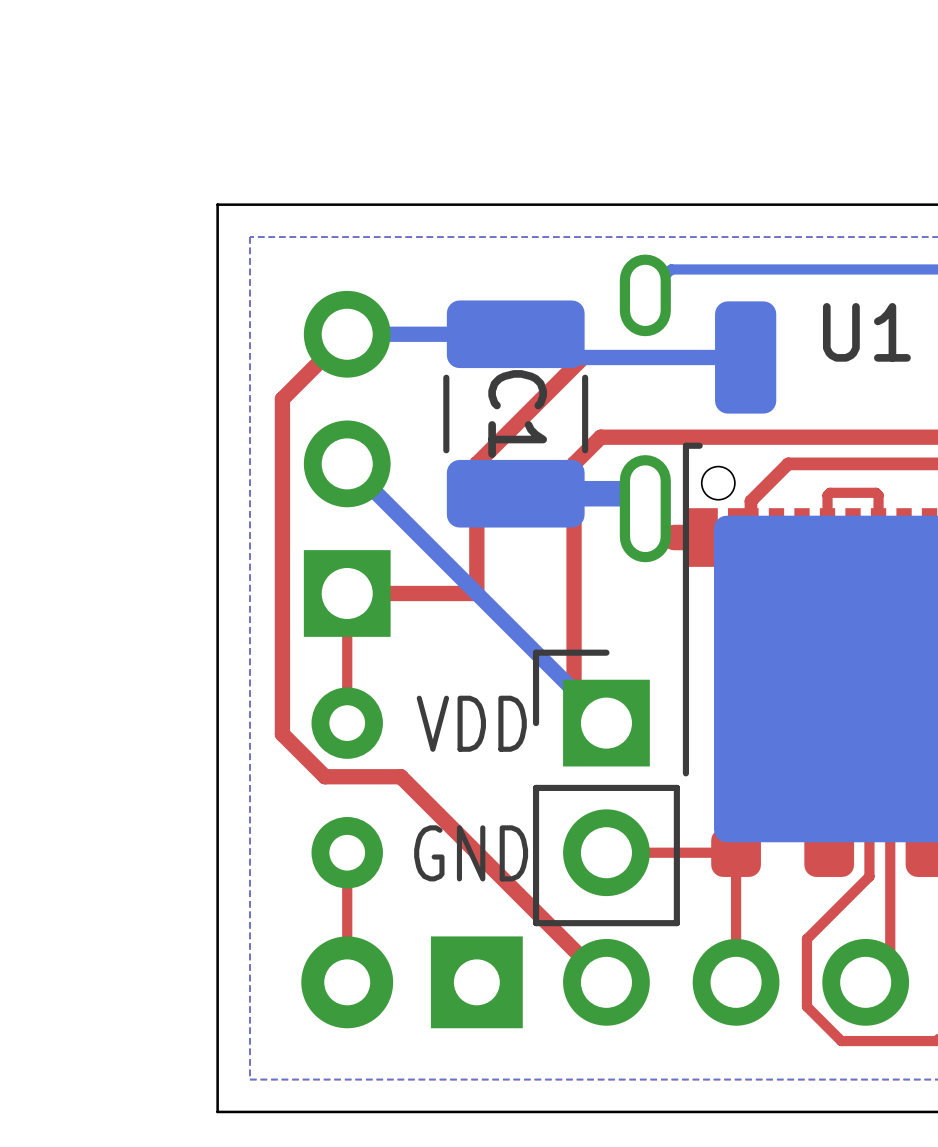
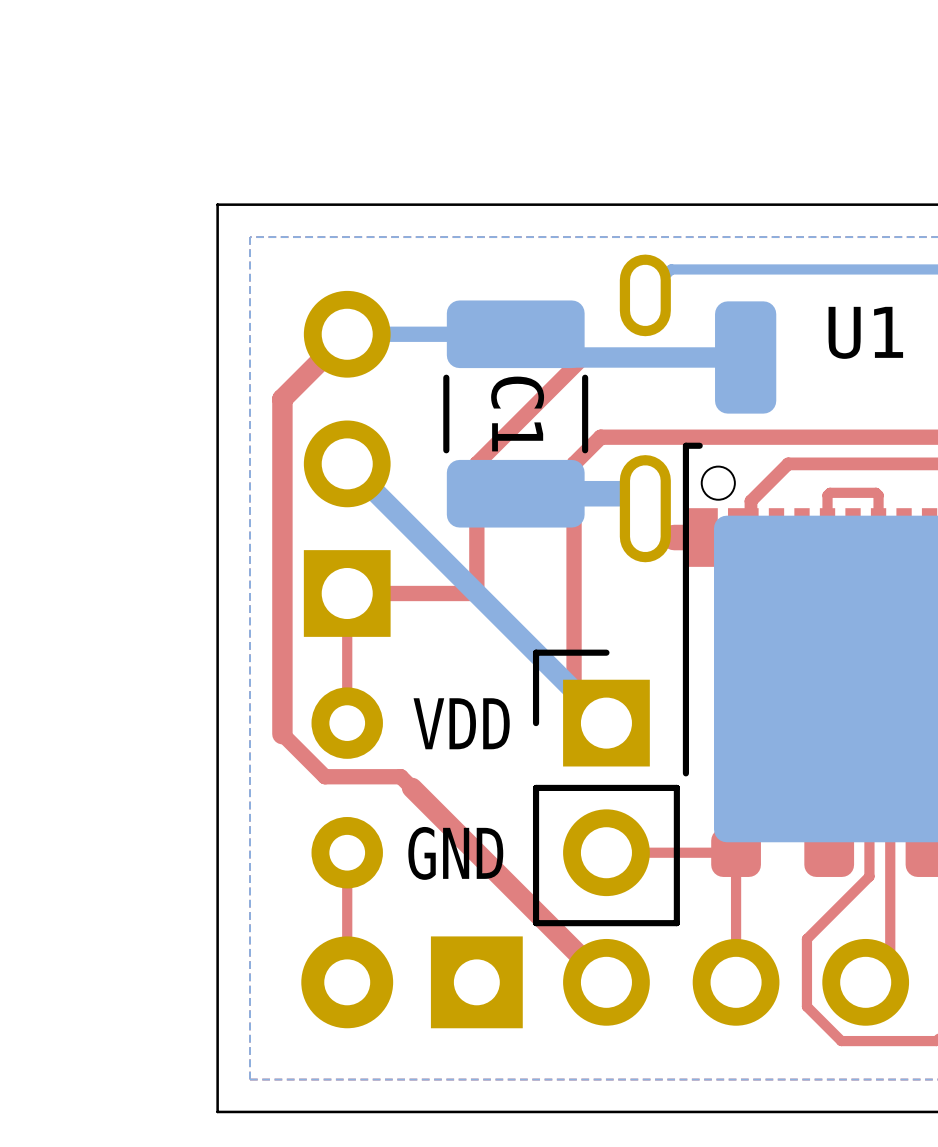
top track width: thin (347, 334) (282, 399) (282, 734) -> thick (347, 334) (282, 399) (282, 734)
bottom track width: thin (745, 357) (538, 357) -> thick (745, 357) (538, 357)
bottom track width: thin (347, 463) (606, 723) -> thick (347, 463) (606, 723)
top track width: thin (412, 787) (606, 982) -> thick (412, 787) (606, 982)

